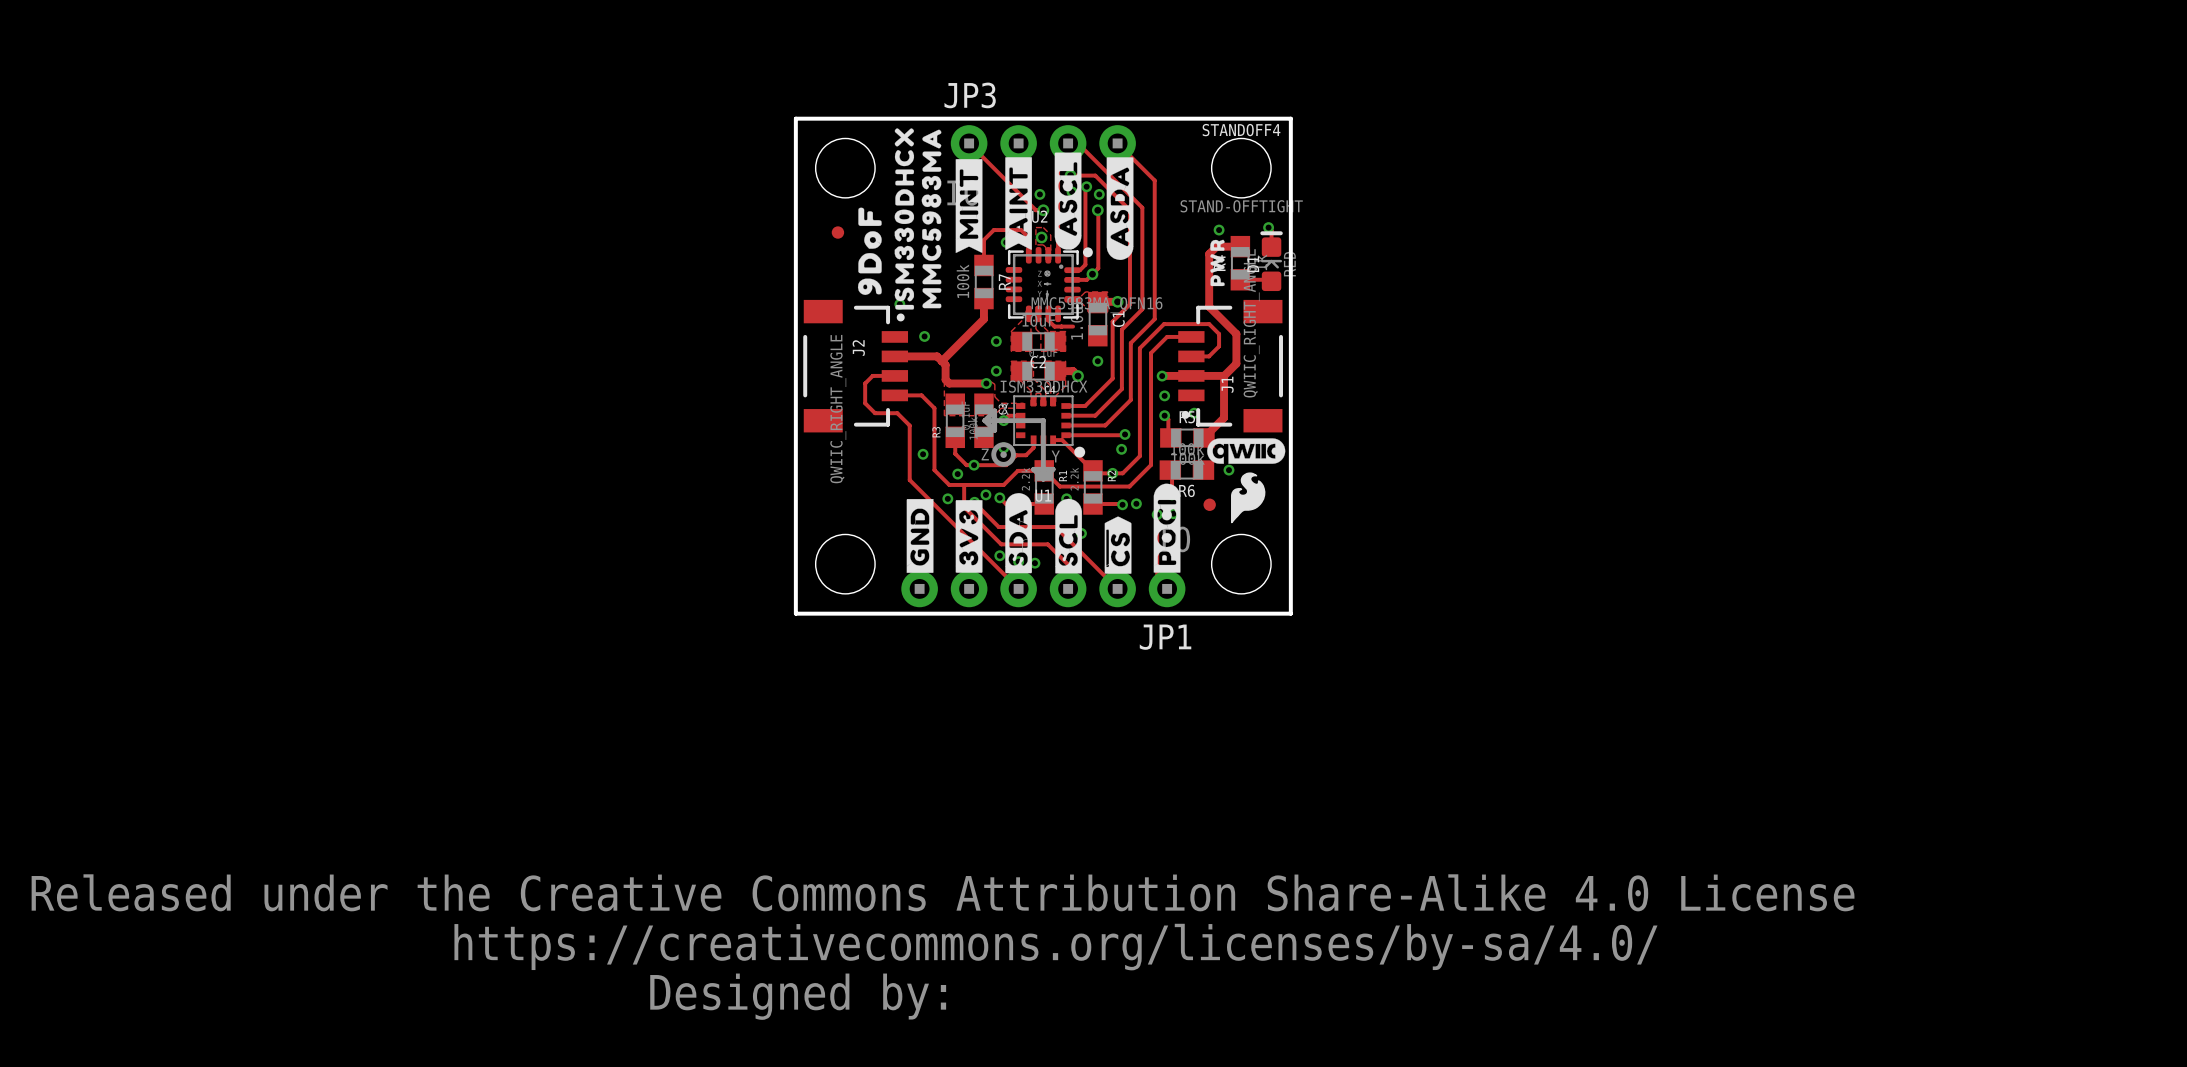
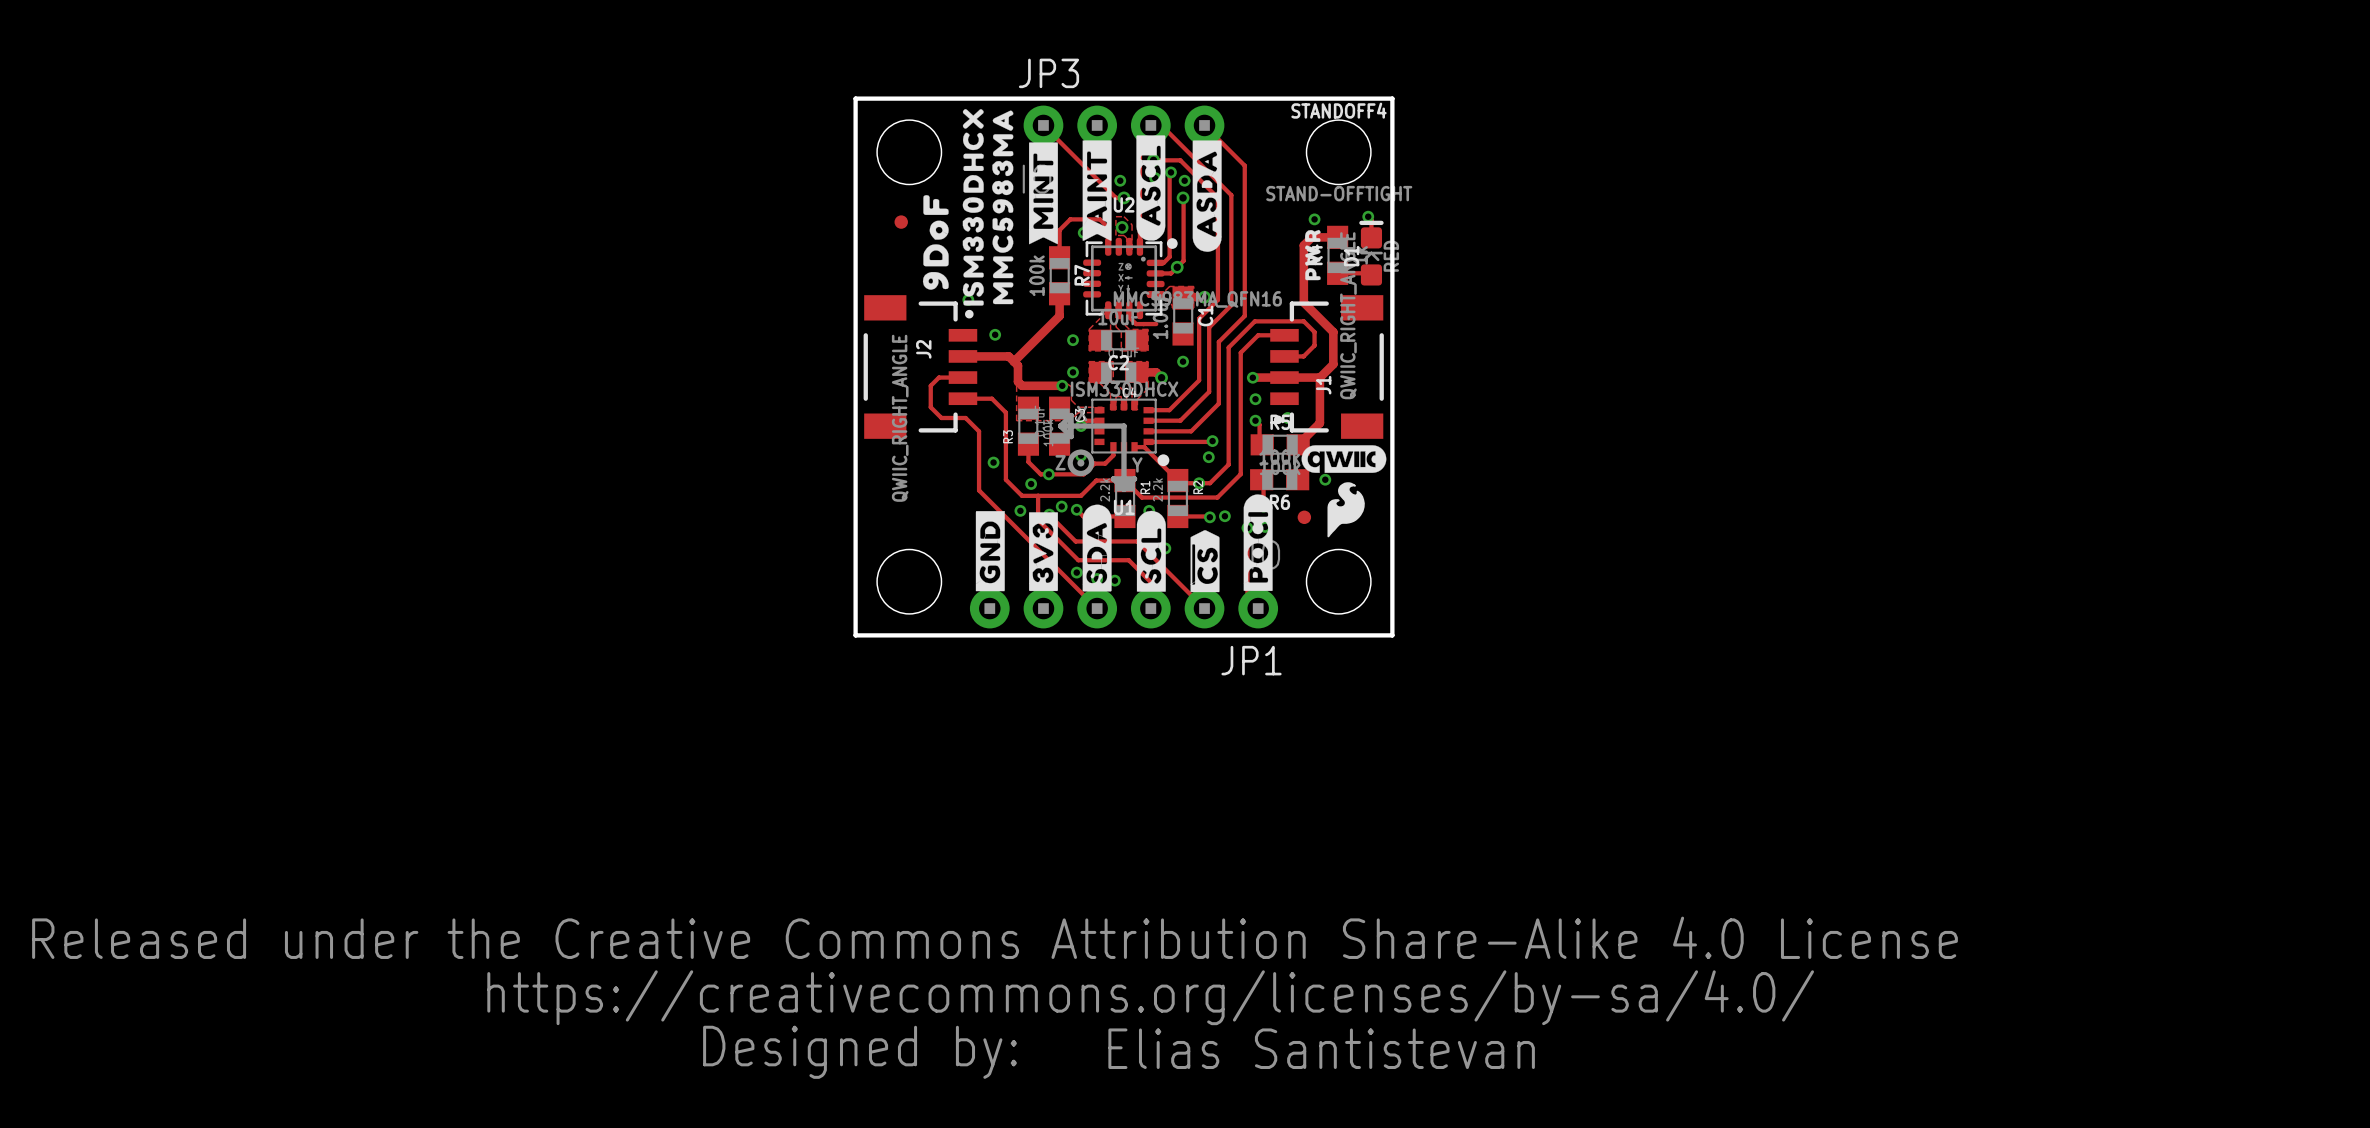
text: none -> Elias Santistevan (1321, 1048)

